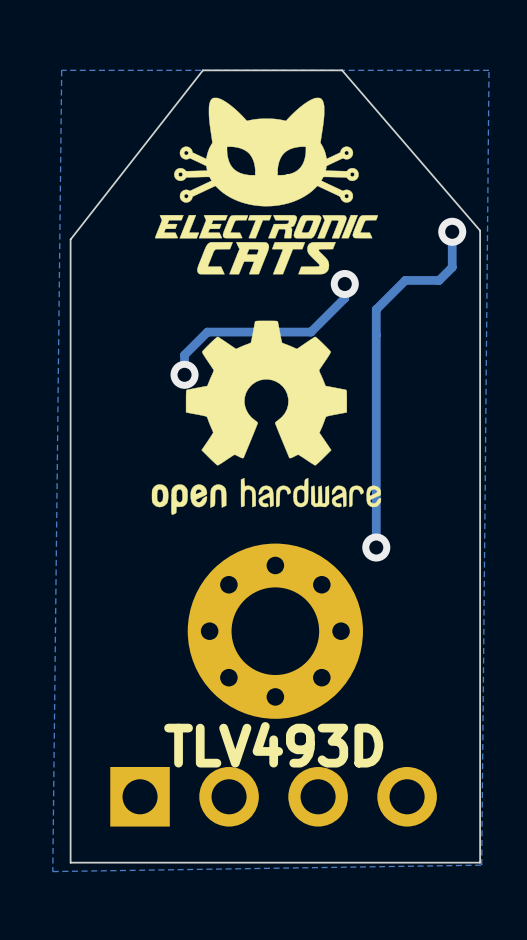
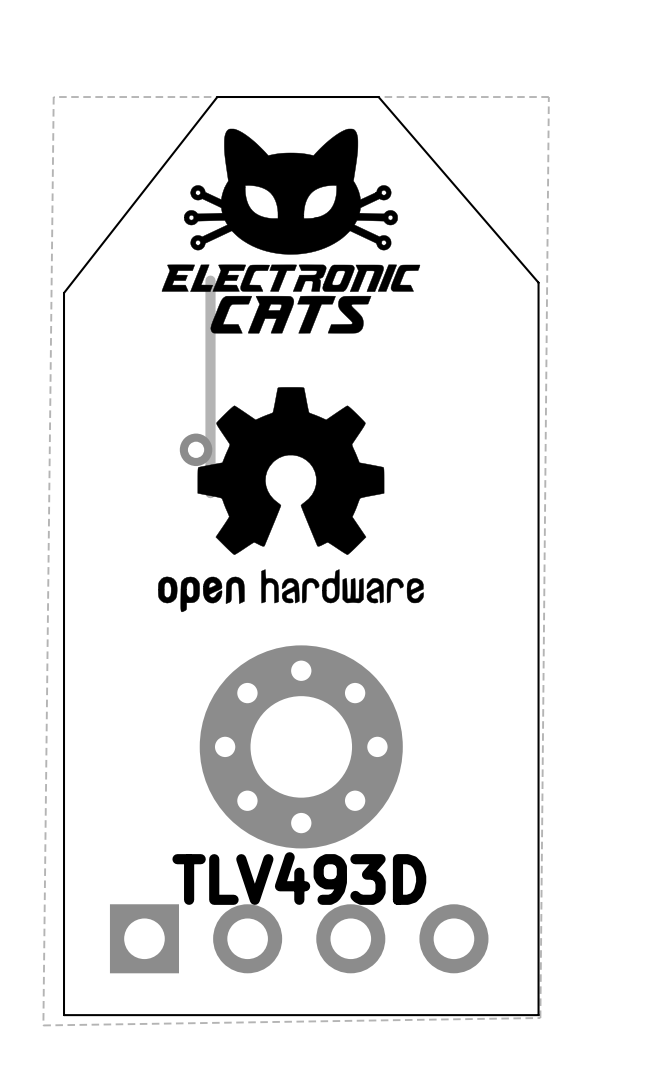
track: none -> (210, 280) (210, 493)
track: (452, 231) (452, 267) (439, 280) (405, 280) (376, 309) (376, 547) -> none
via: (452, 231) -> none
track: (344, 284) (344, 298) (310, 332) (207, 332) (184, 354) (184, 374) -> none
via: (344, 284) -> none
via: (376, 547) -> none

